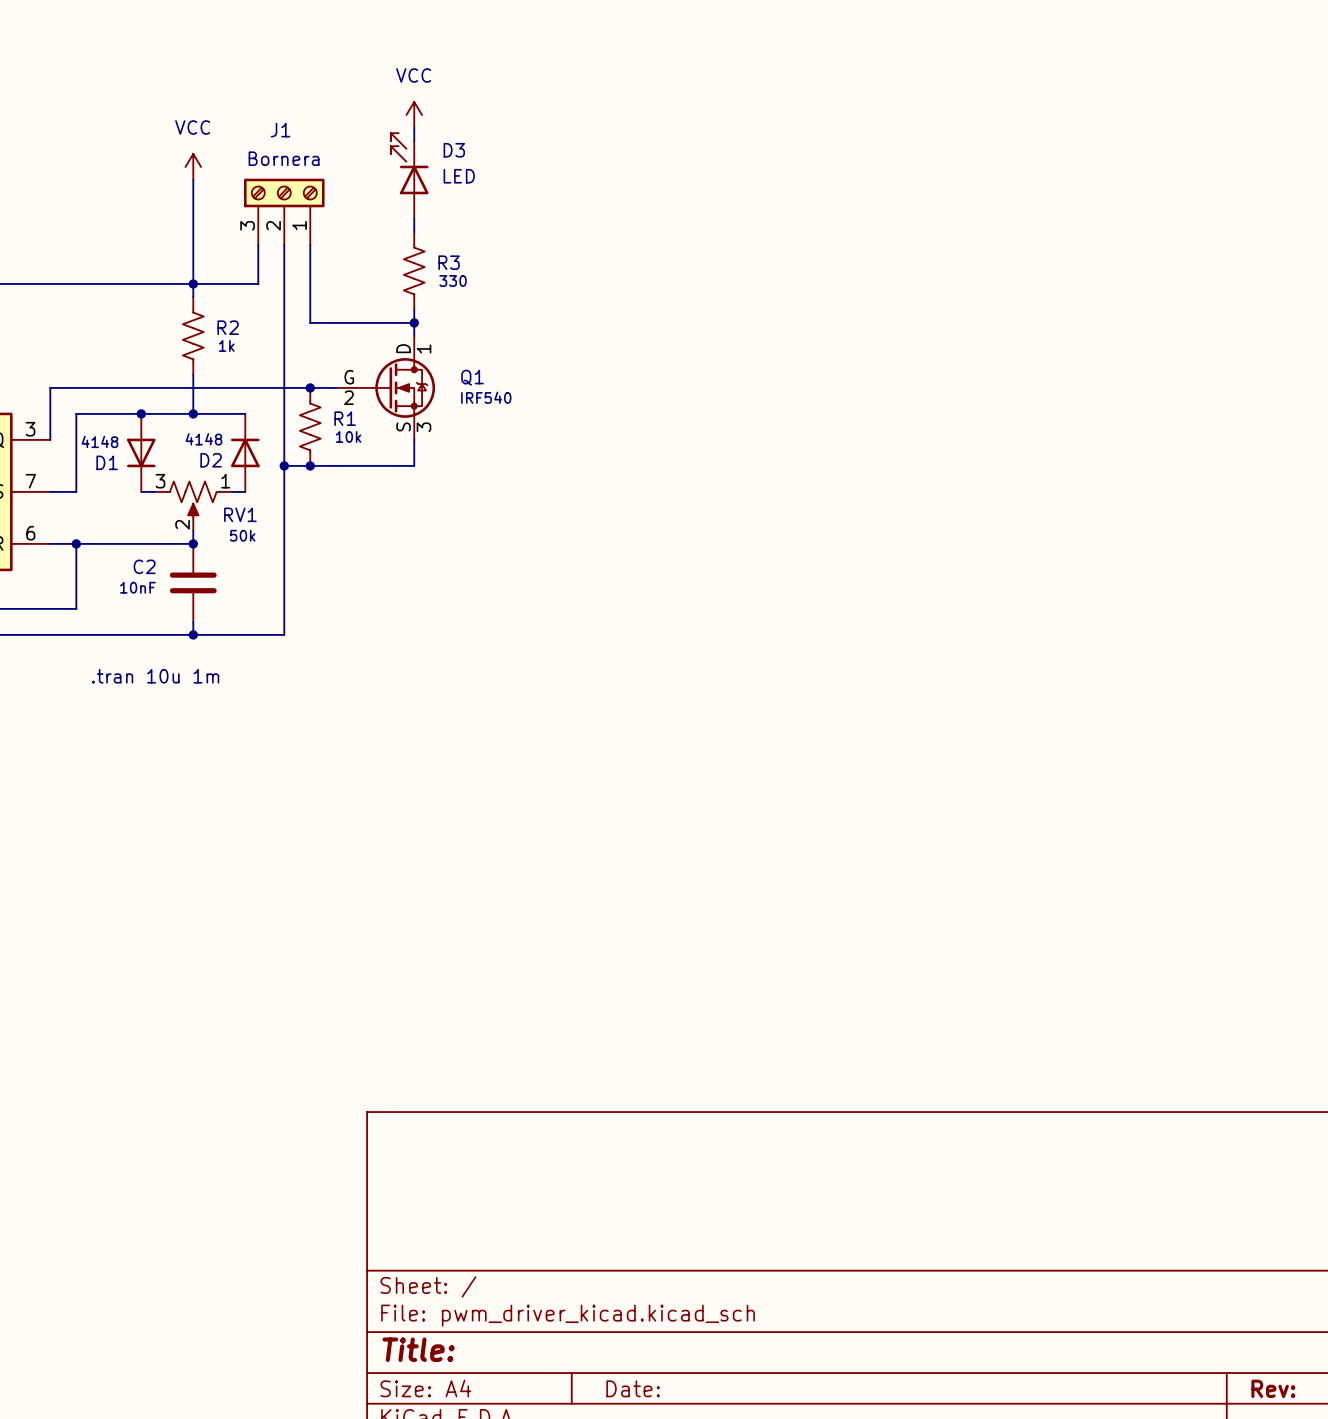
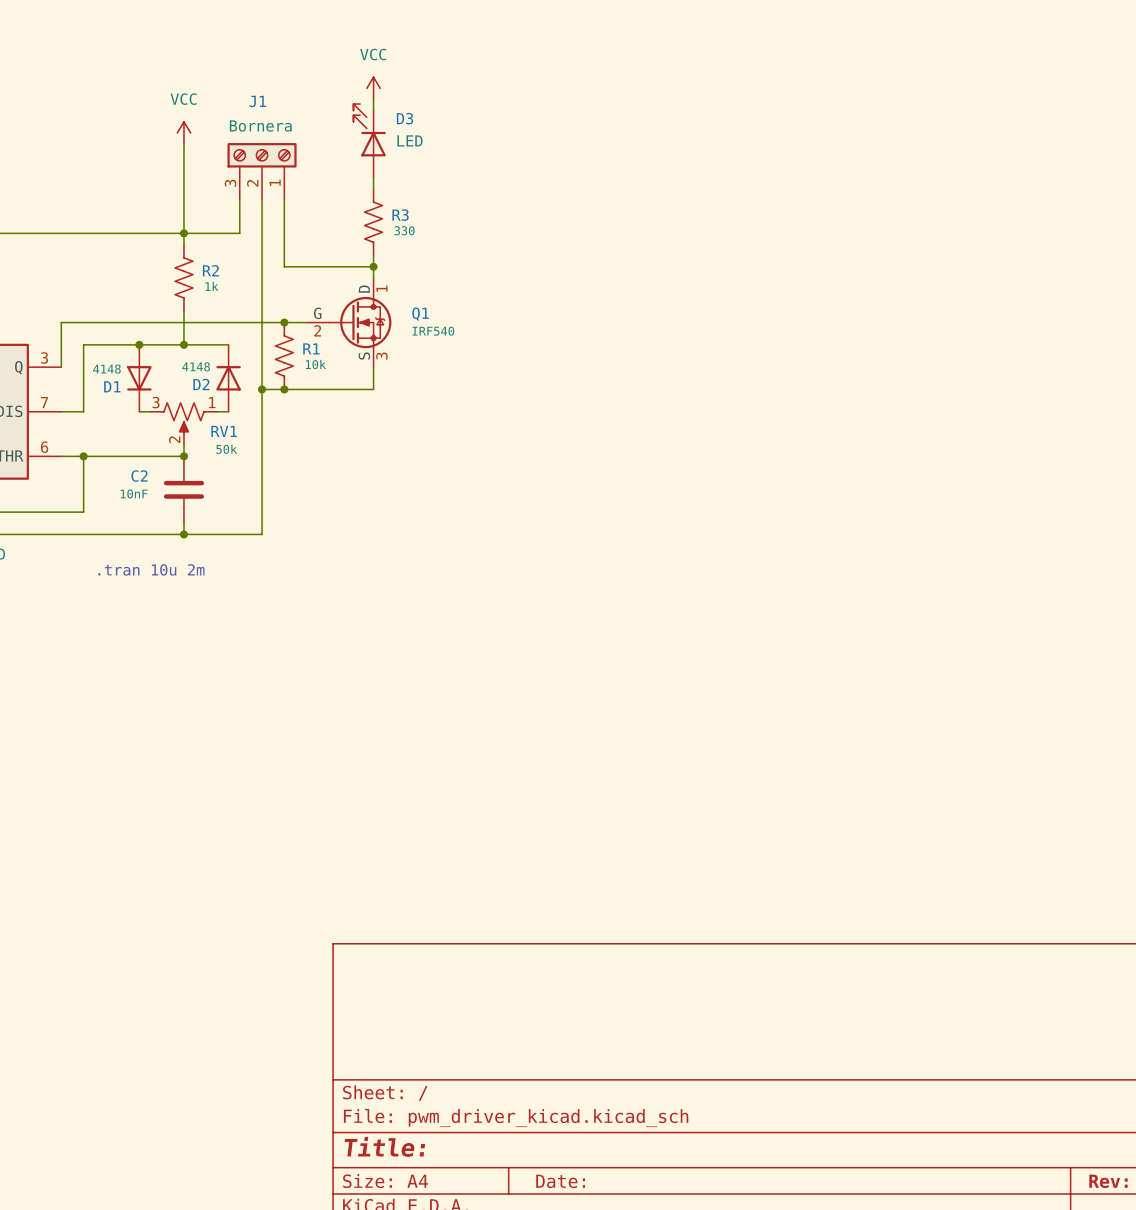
text: .tran 10u 1m (155, 676) -> .tran 10u 2m (151, 569)

